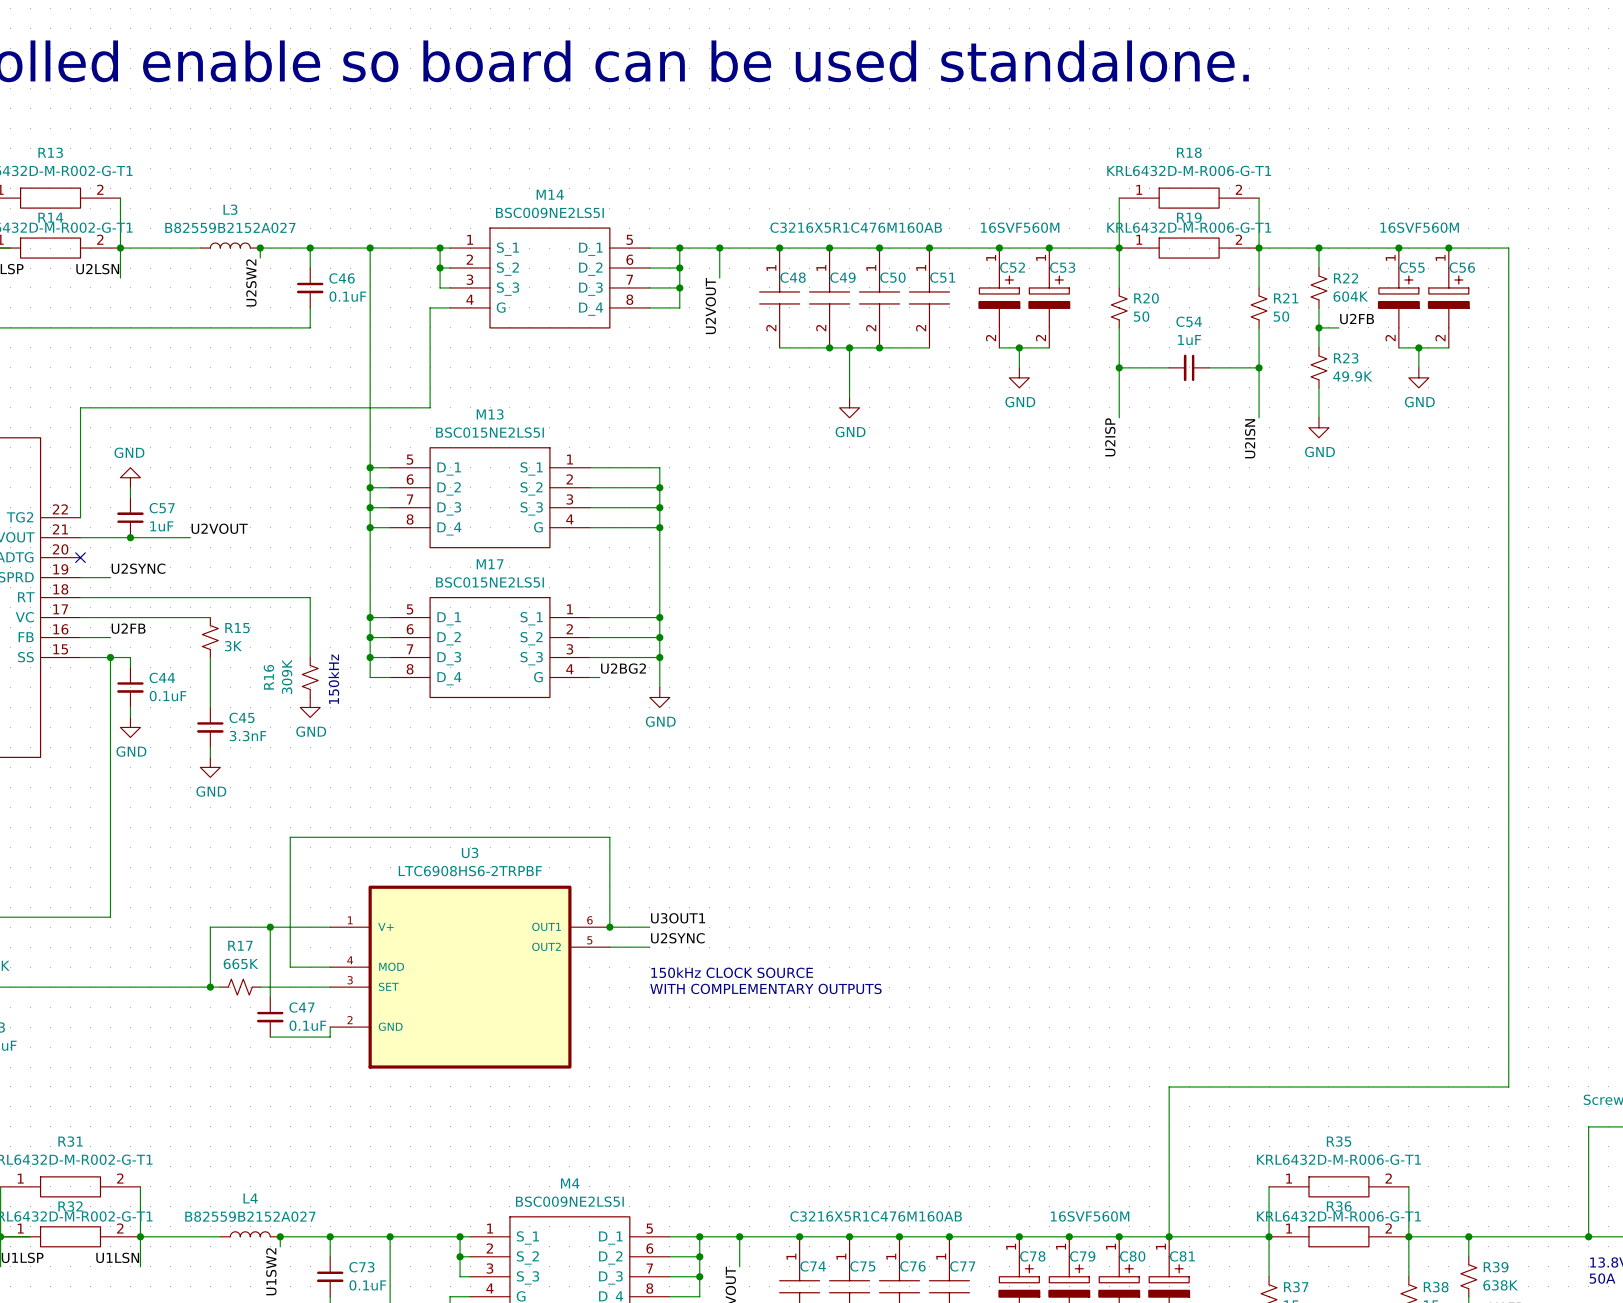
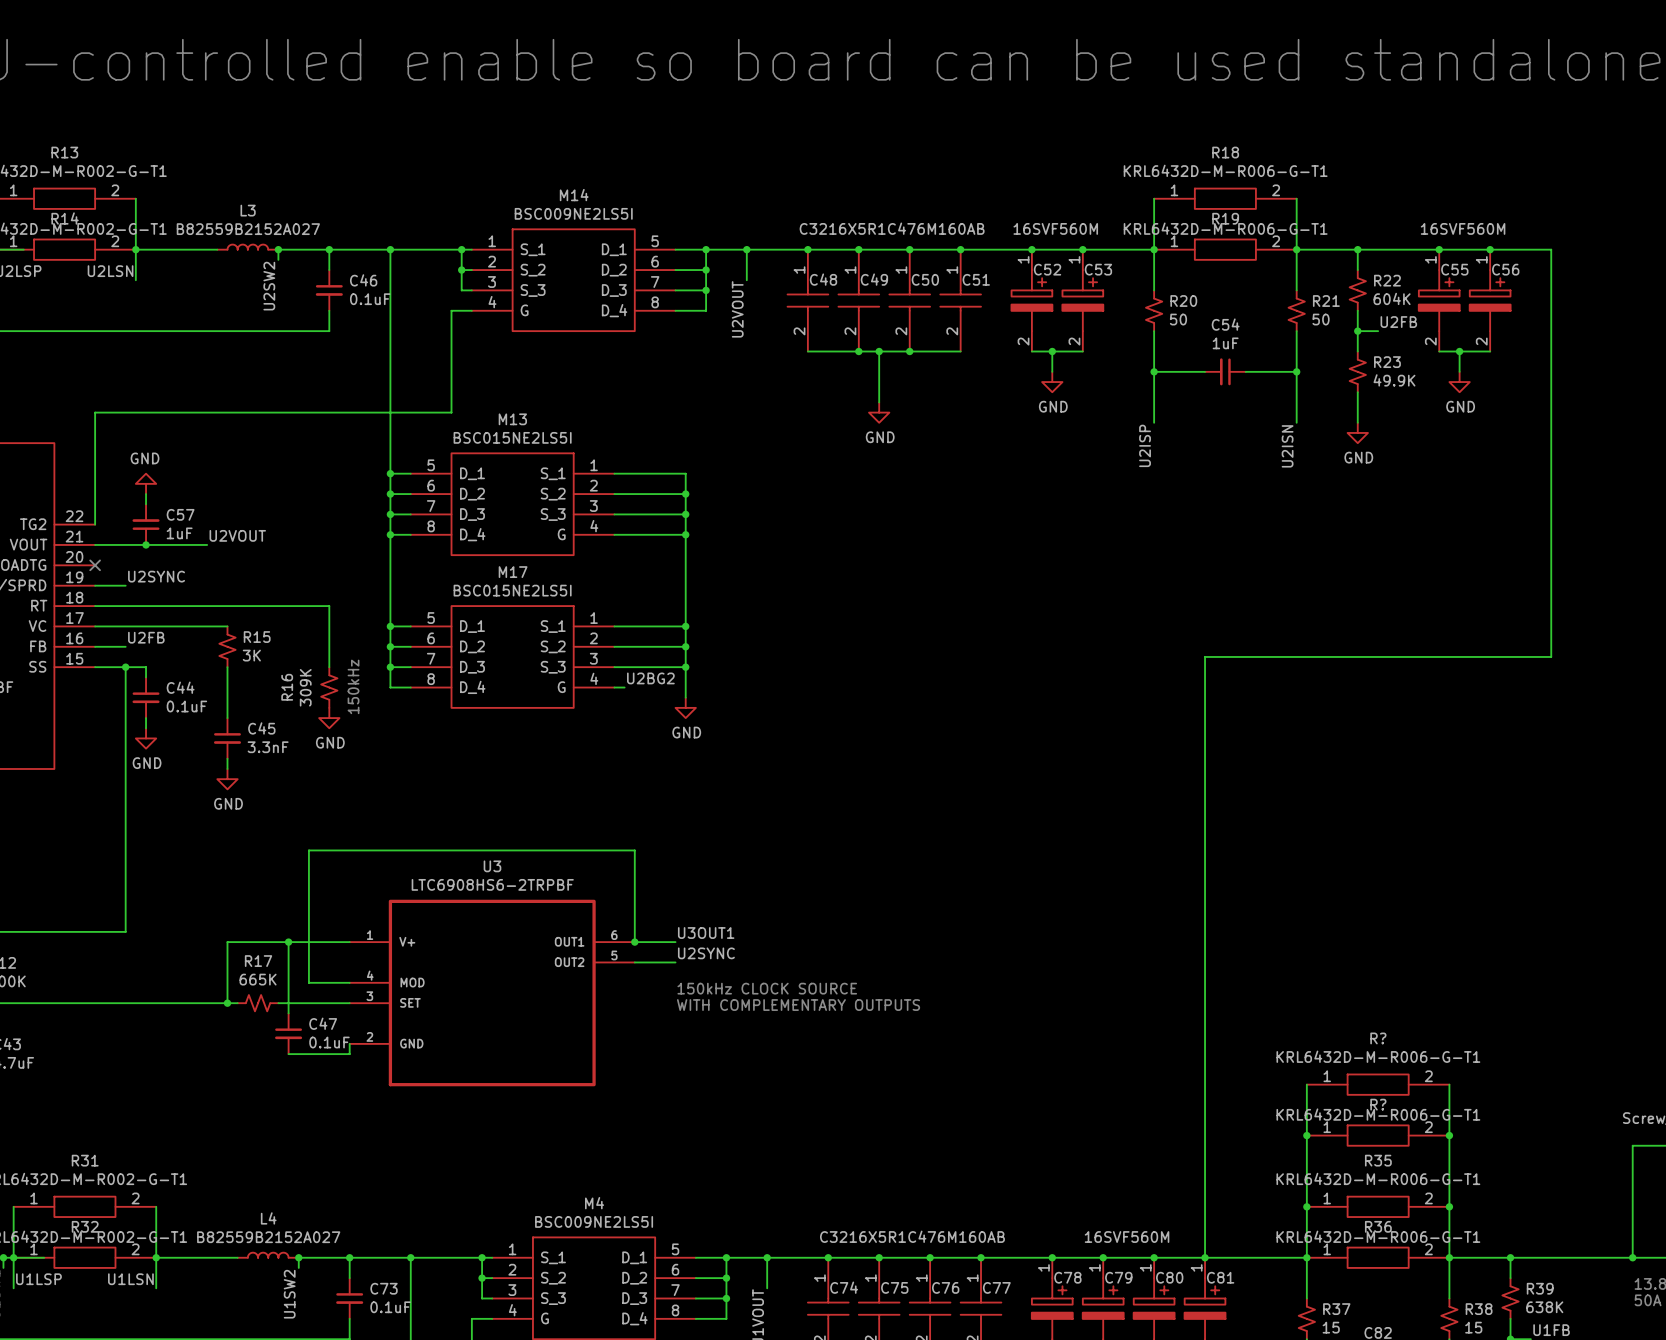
wire: (1508, 647) (1508, 1086) (1169, 1086) -> (1551, 656) (1205, 656) (1205, 1105)
wire: none -> (1306, 1084) (1306, 1206)
R?: none -> KRL6432D-M-R006-G-T1 (1378, 1084)
wire: none -> (1449, 1084) (1449, 1206)
junction: none -> (1306, 1135)
R?: none -> KRL6432D-M-R006-G-T1 (1378, 1135)
junction: none -> (1449, 1135)
junction: none -> (1306, 1206)
junction: none -> (1449, 1206)

